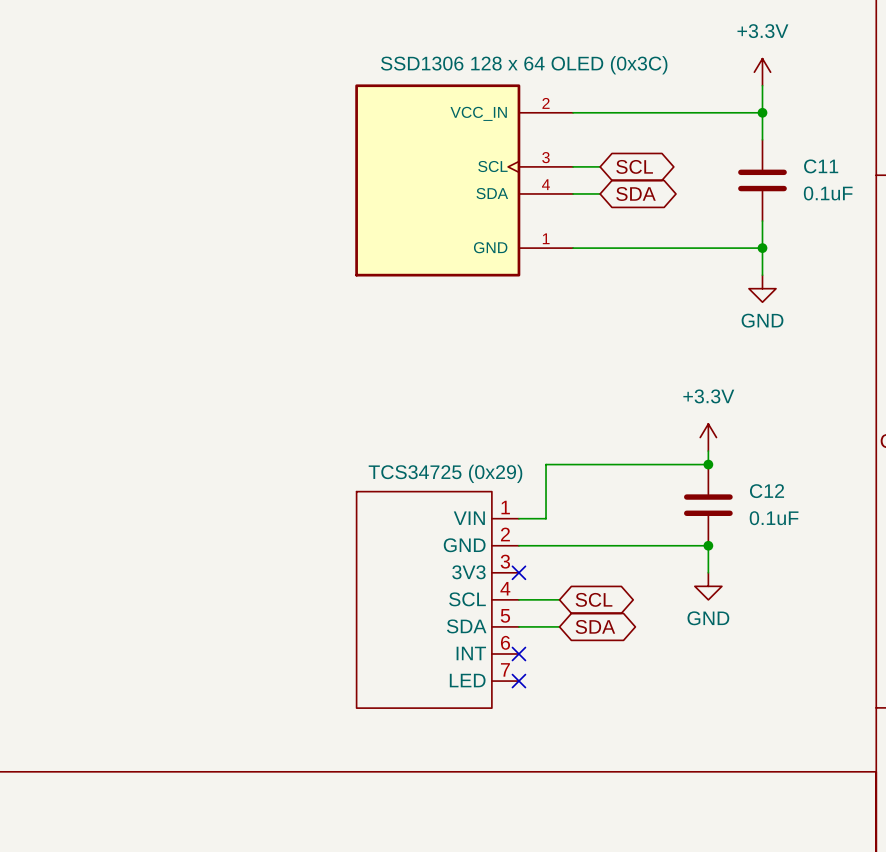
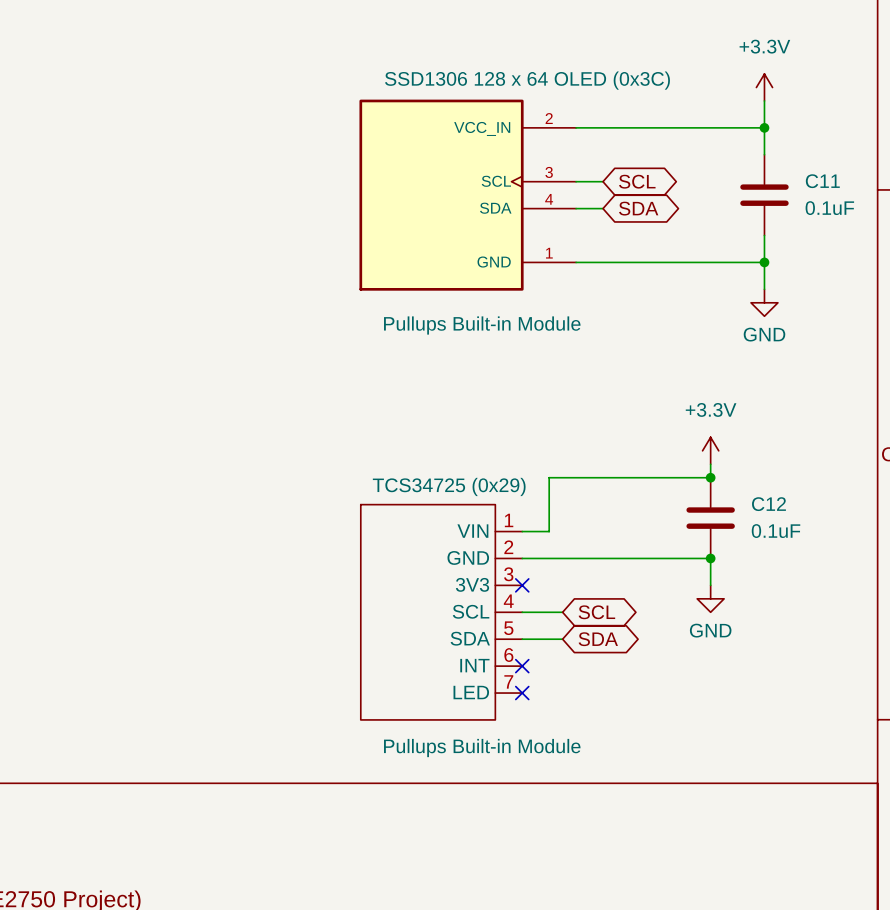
part text: none -> Pullups Built-in Module (482, 325)
part text: none -> Pullups Built-in Module (482, 748)

